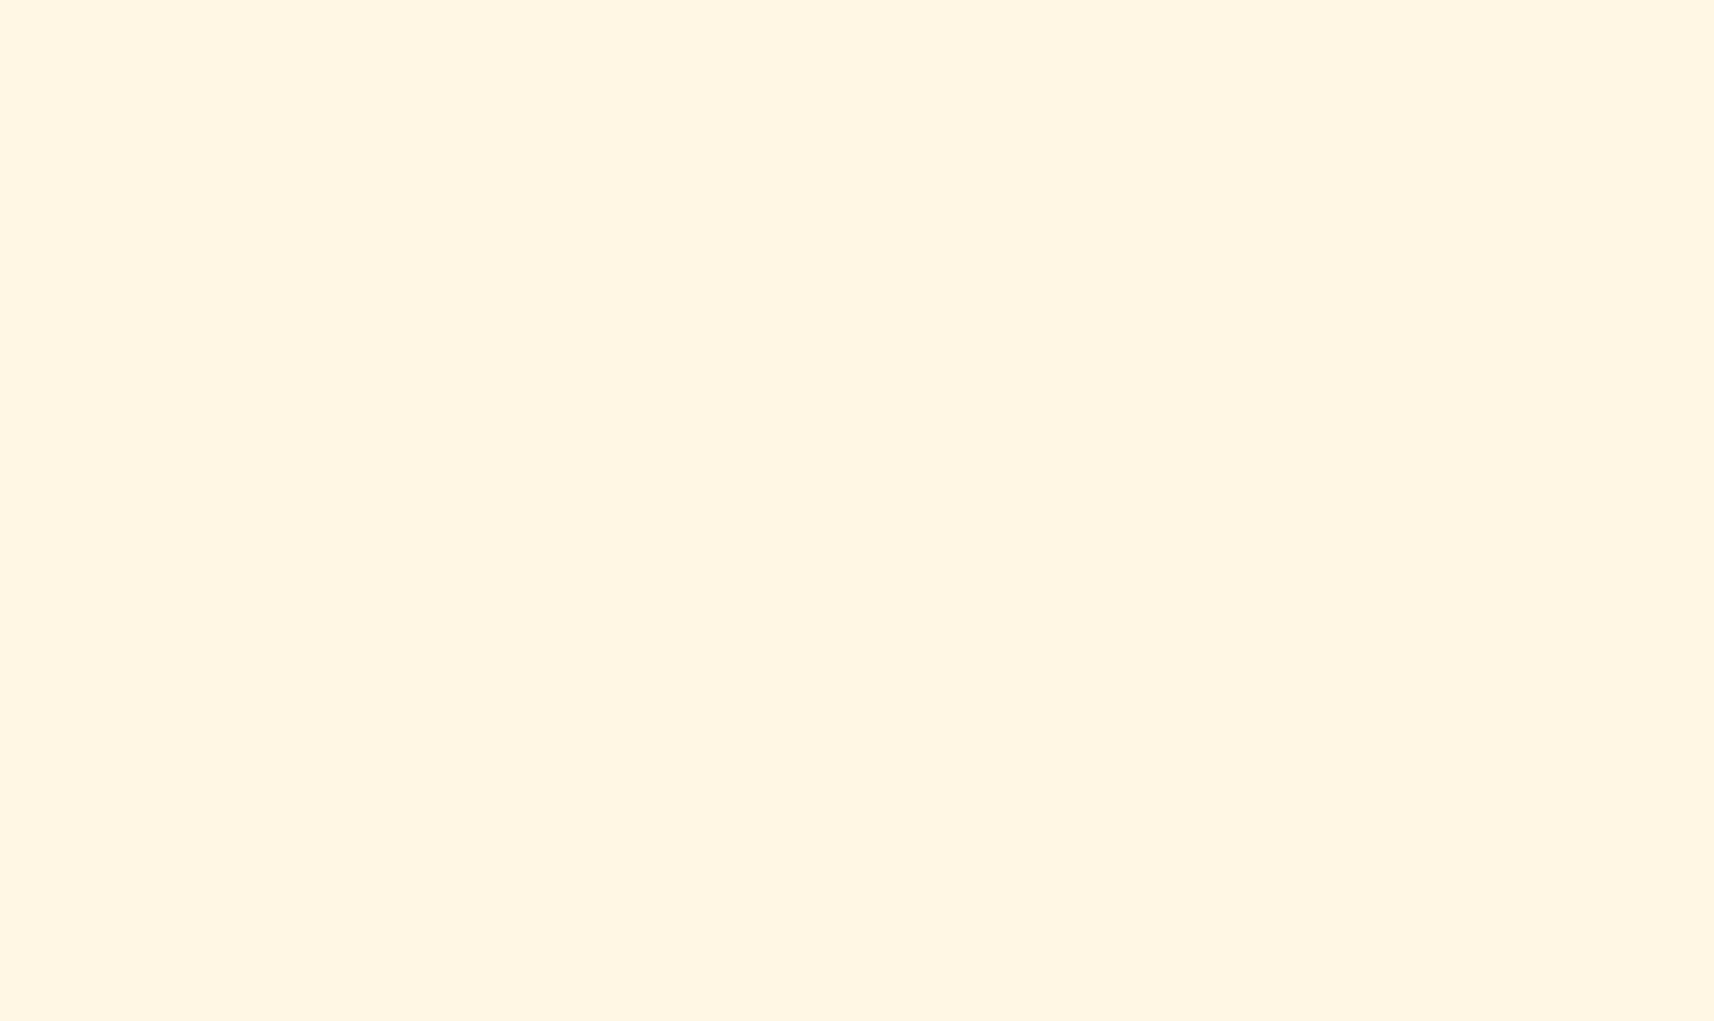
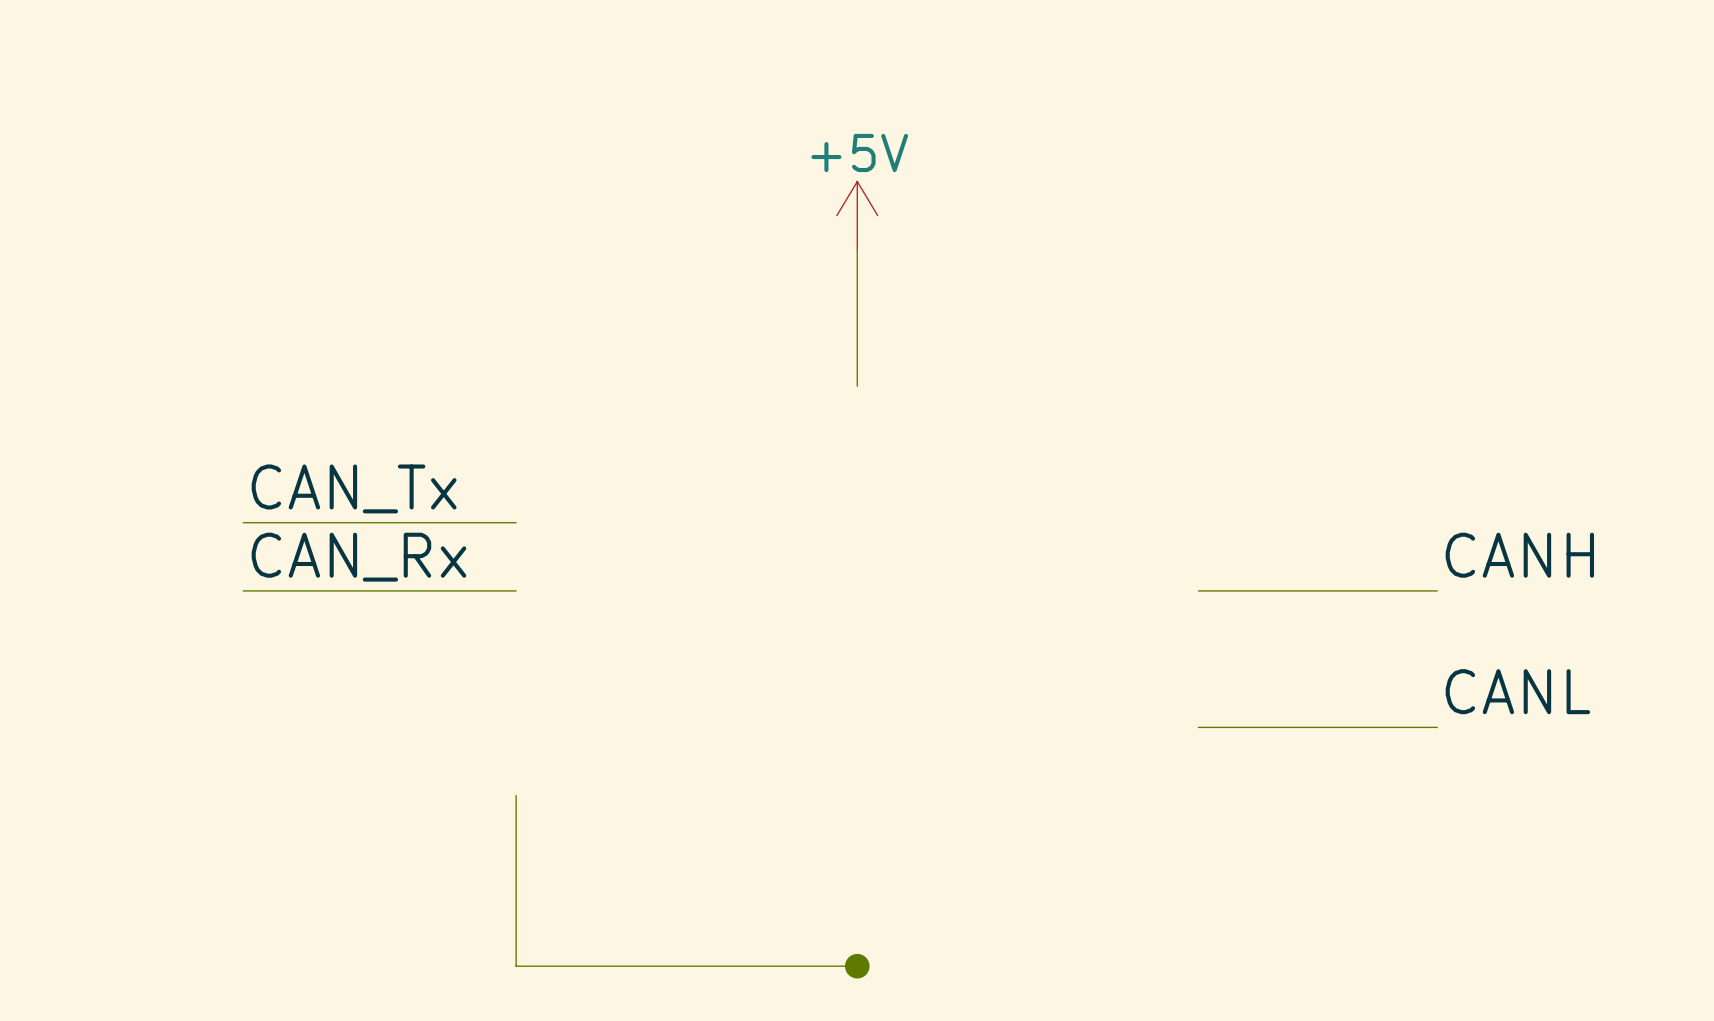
power symbol: none -> +5V (857, 215)
wire: none -> (857, 249) (857, 386)
label: none -> CAN_Tx (354, 488)
wire: none -> (243, 522) (516, 522)
label: none -> CANH (1519, 555)
label: none -> CAN_Rx (358, 557)
wire: none -> (243, 590) (516, 590)
wire: none -> (1198, 590) (1437, 590)
label: none -> CANL (1517, 691)
wire: none -> (1198, 727) (1437, 727)
wire: none -> (516, 795) (516, 966) (857, 966)
junction: none -> (857, 966)

